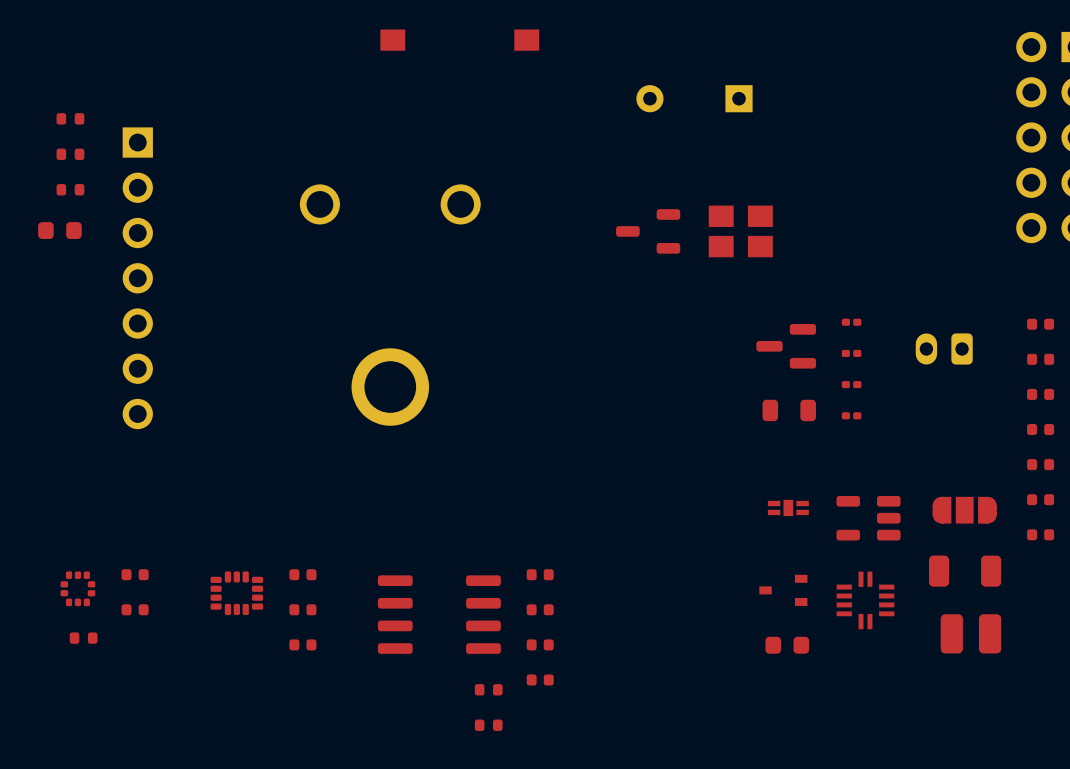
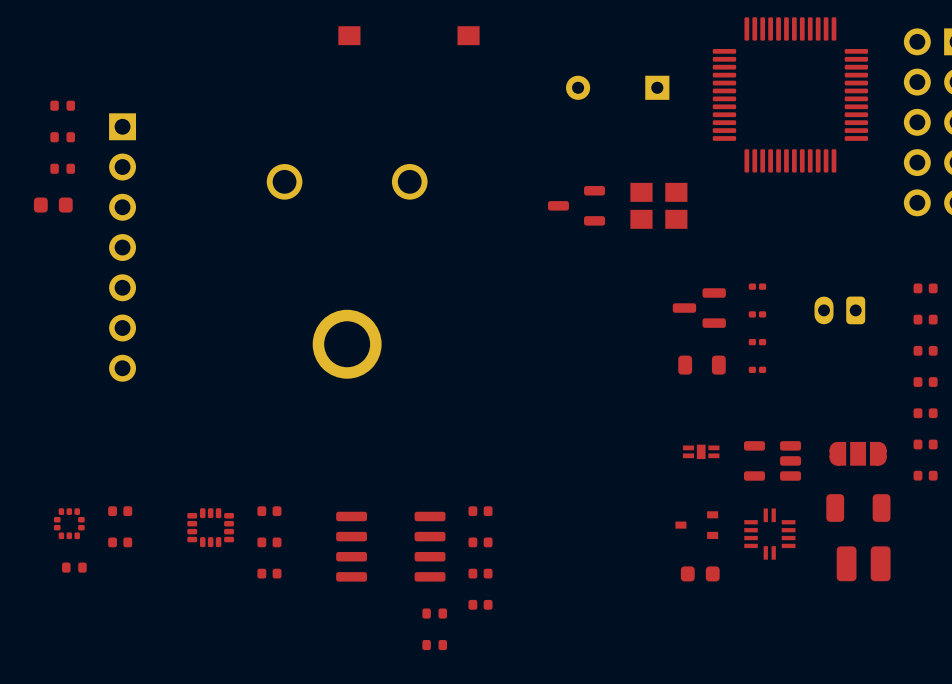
part: none -> (790, 94)

